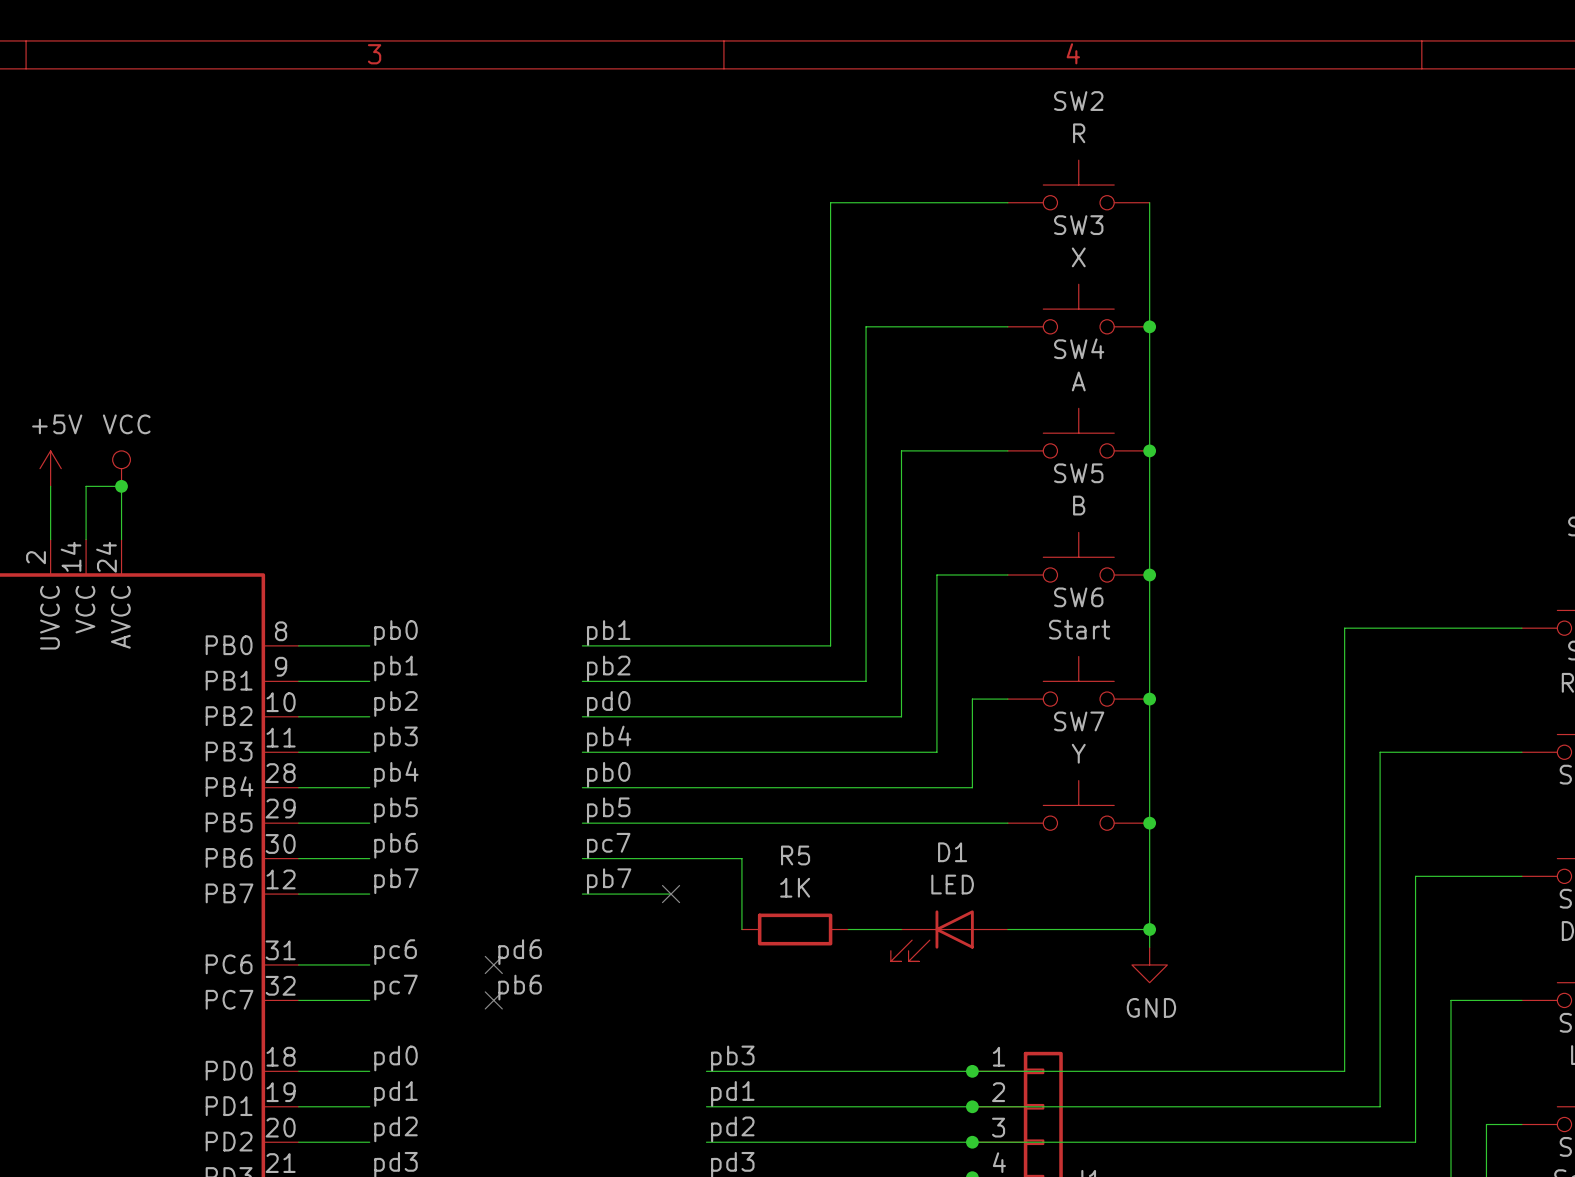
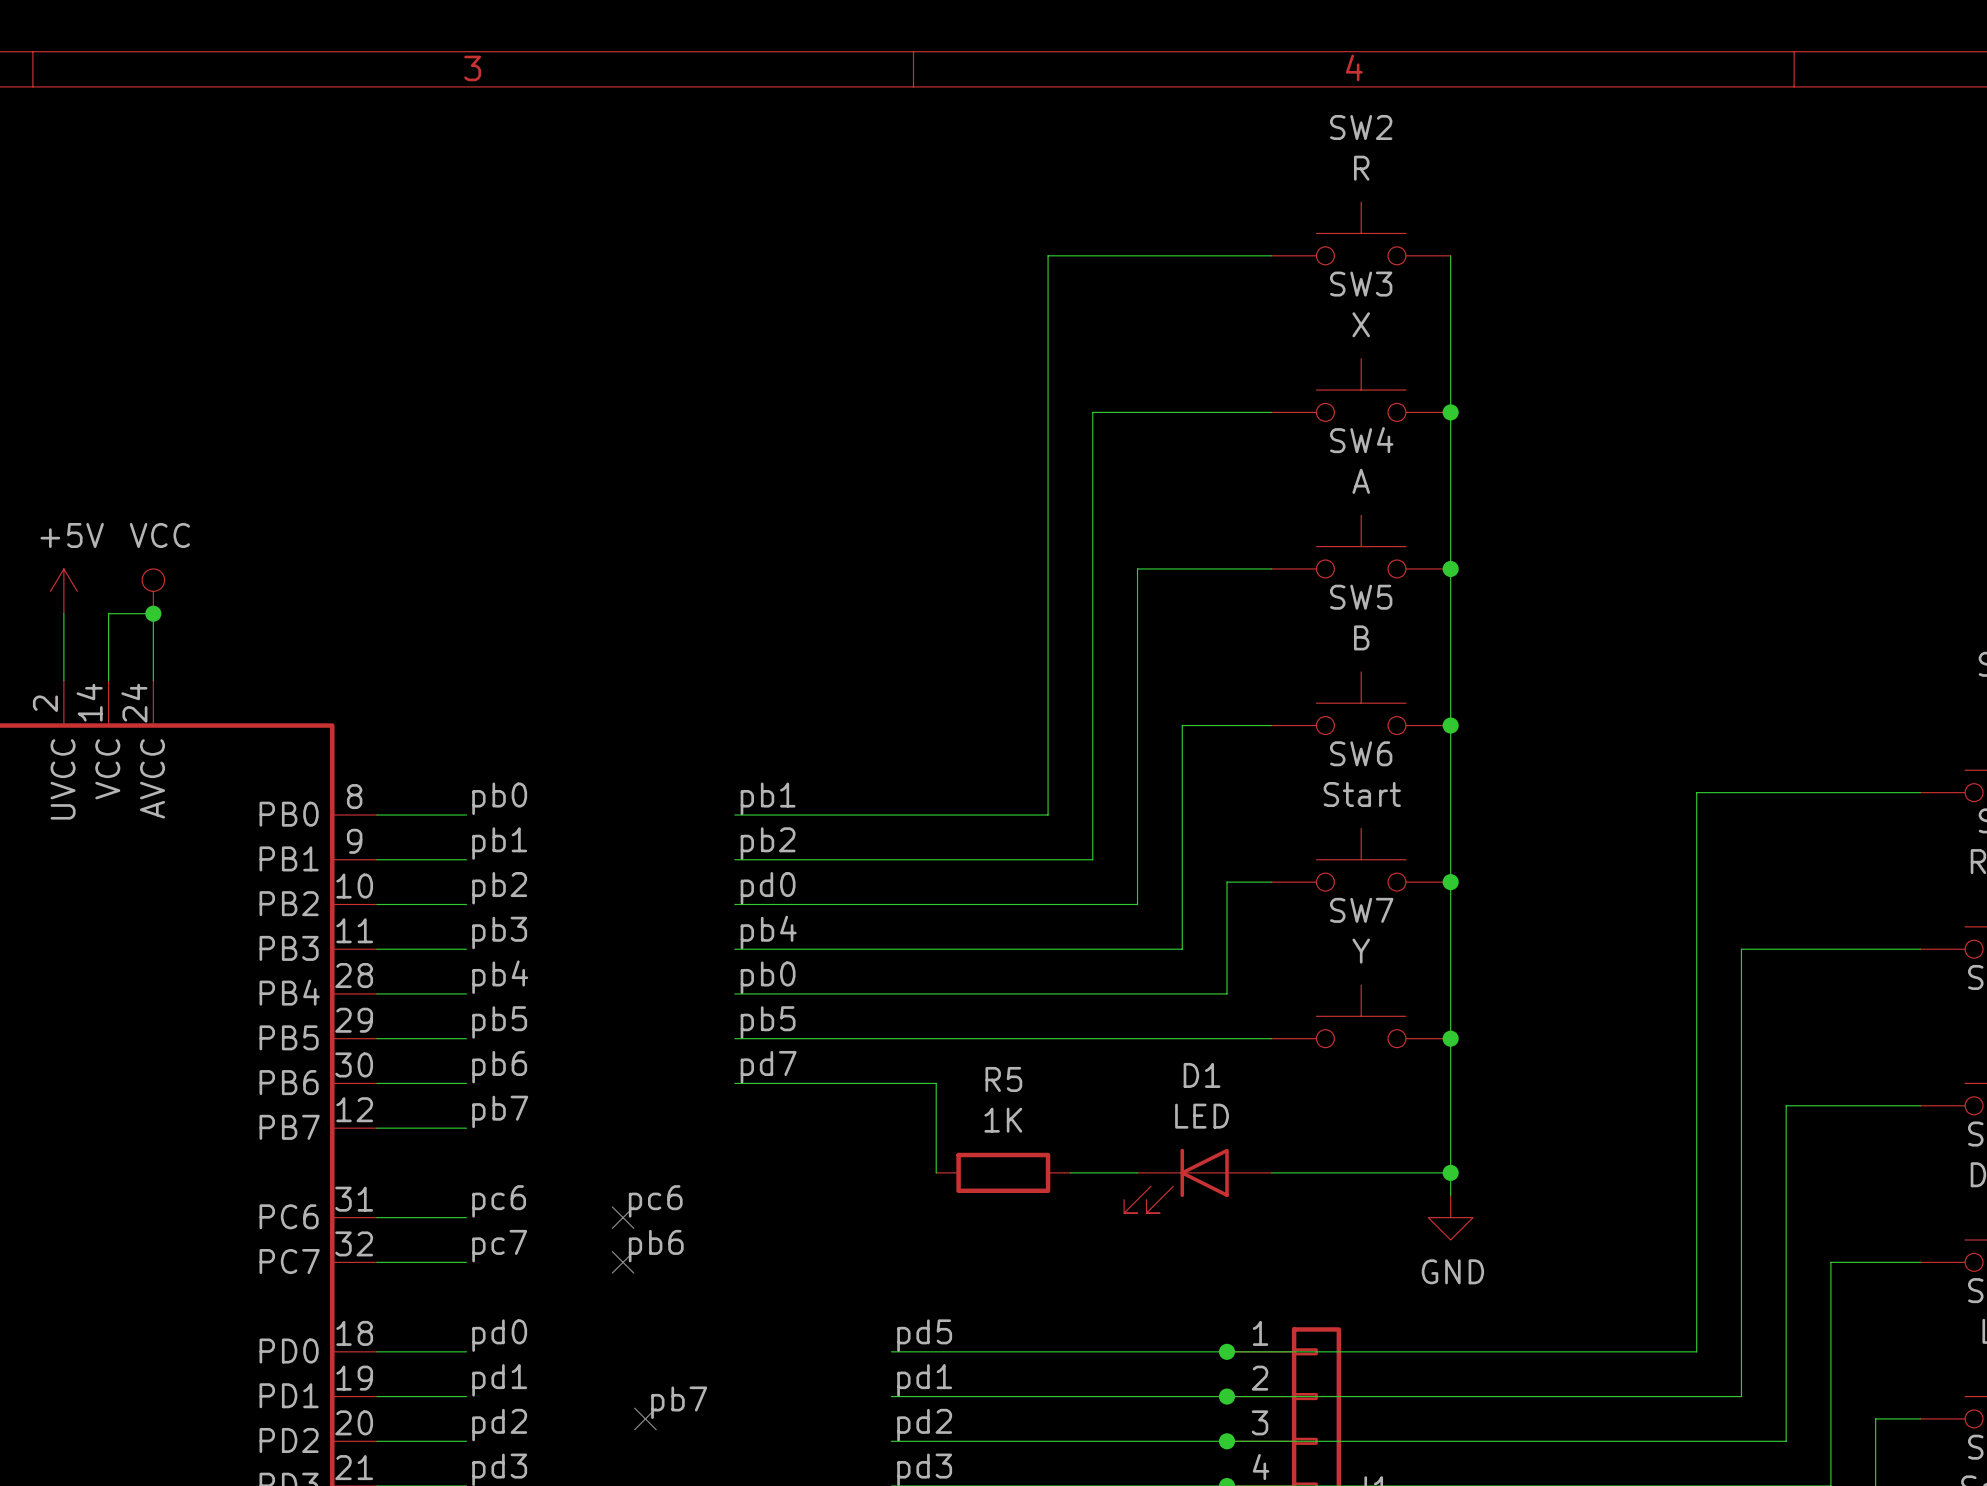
label: pc7 (608, 845) -> pd7 (768, 1067)
label position: pb7 (609, 881) -> pb7 (679, 1402)
wire: (582, 894) (671, 894) -> none
no-connect mark: (671, 894) -> none
label: pd6 (520, 952) -> pc6 (655, 1201)
label: pb3 (732, 1058) -> pd5 (924, 1335)
no-connect mark: none -> (645, 1418)

